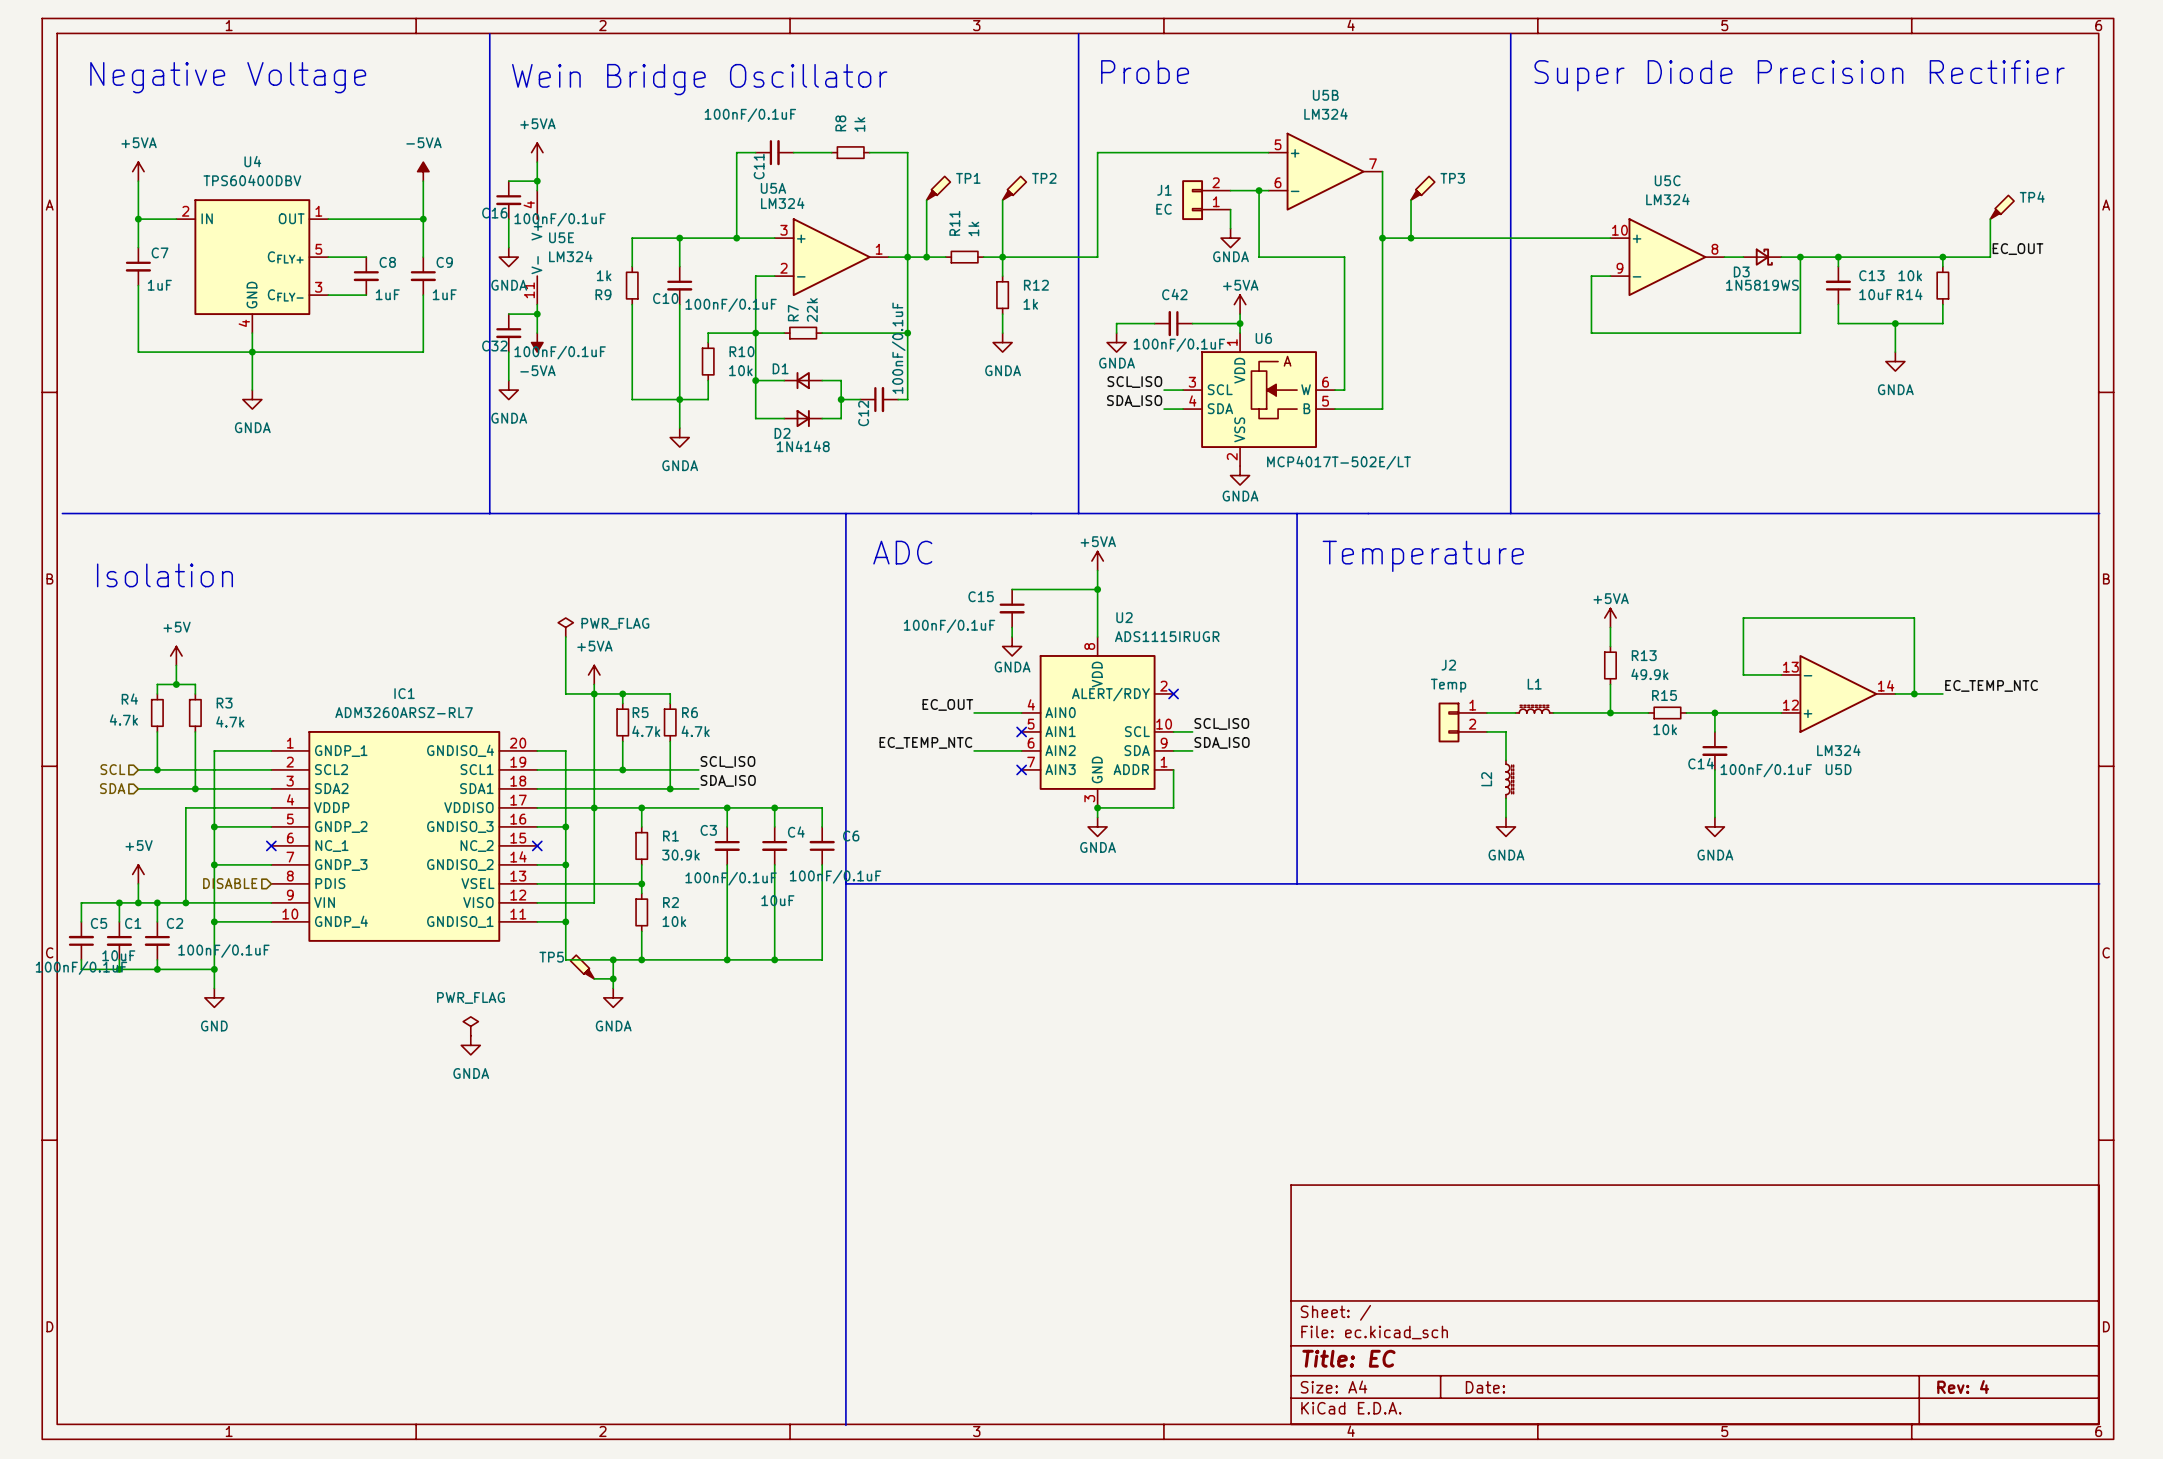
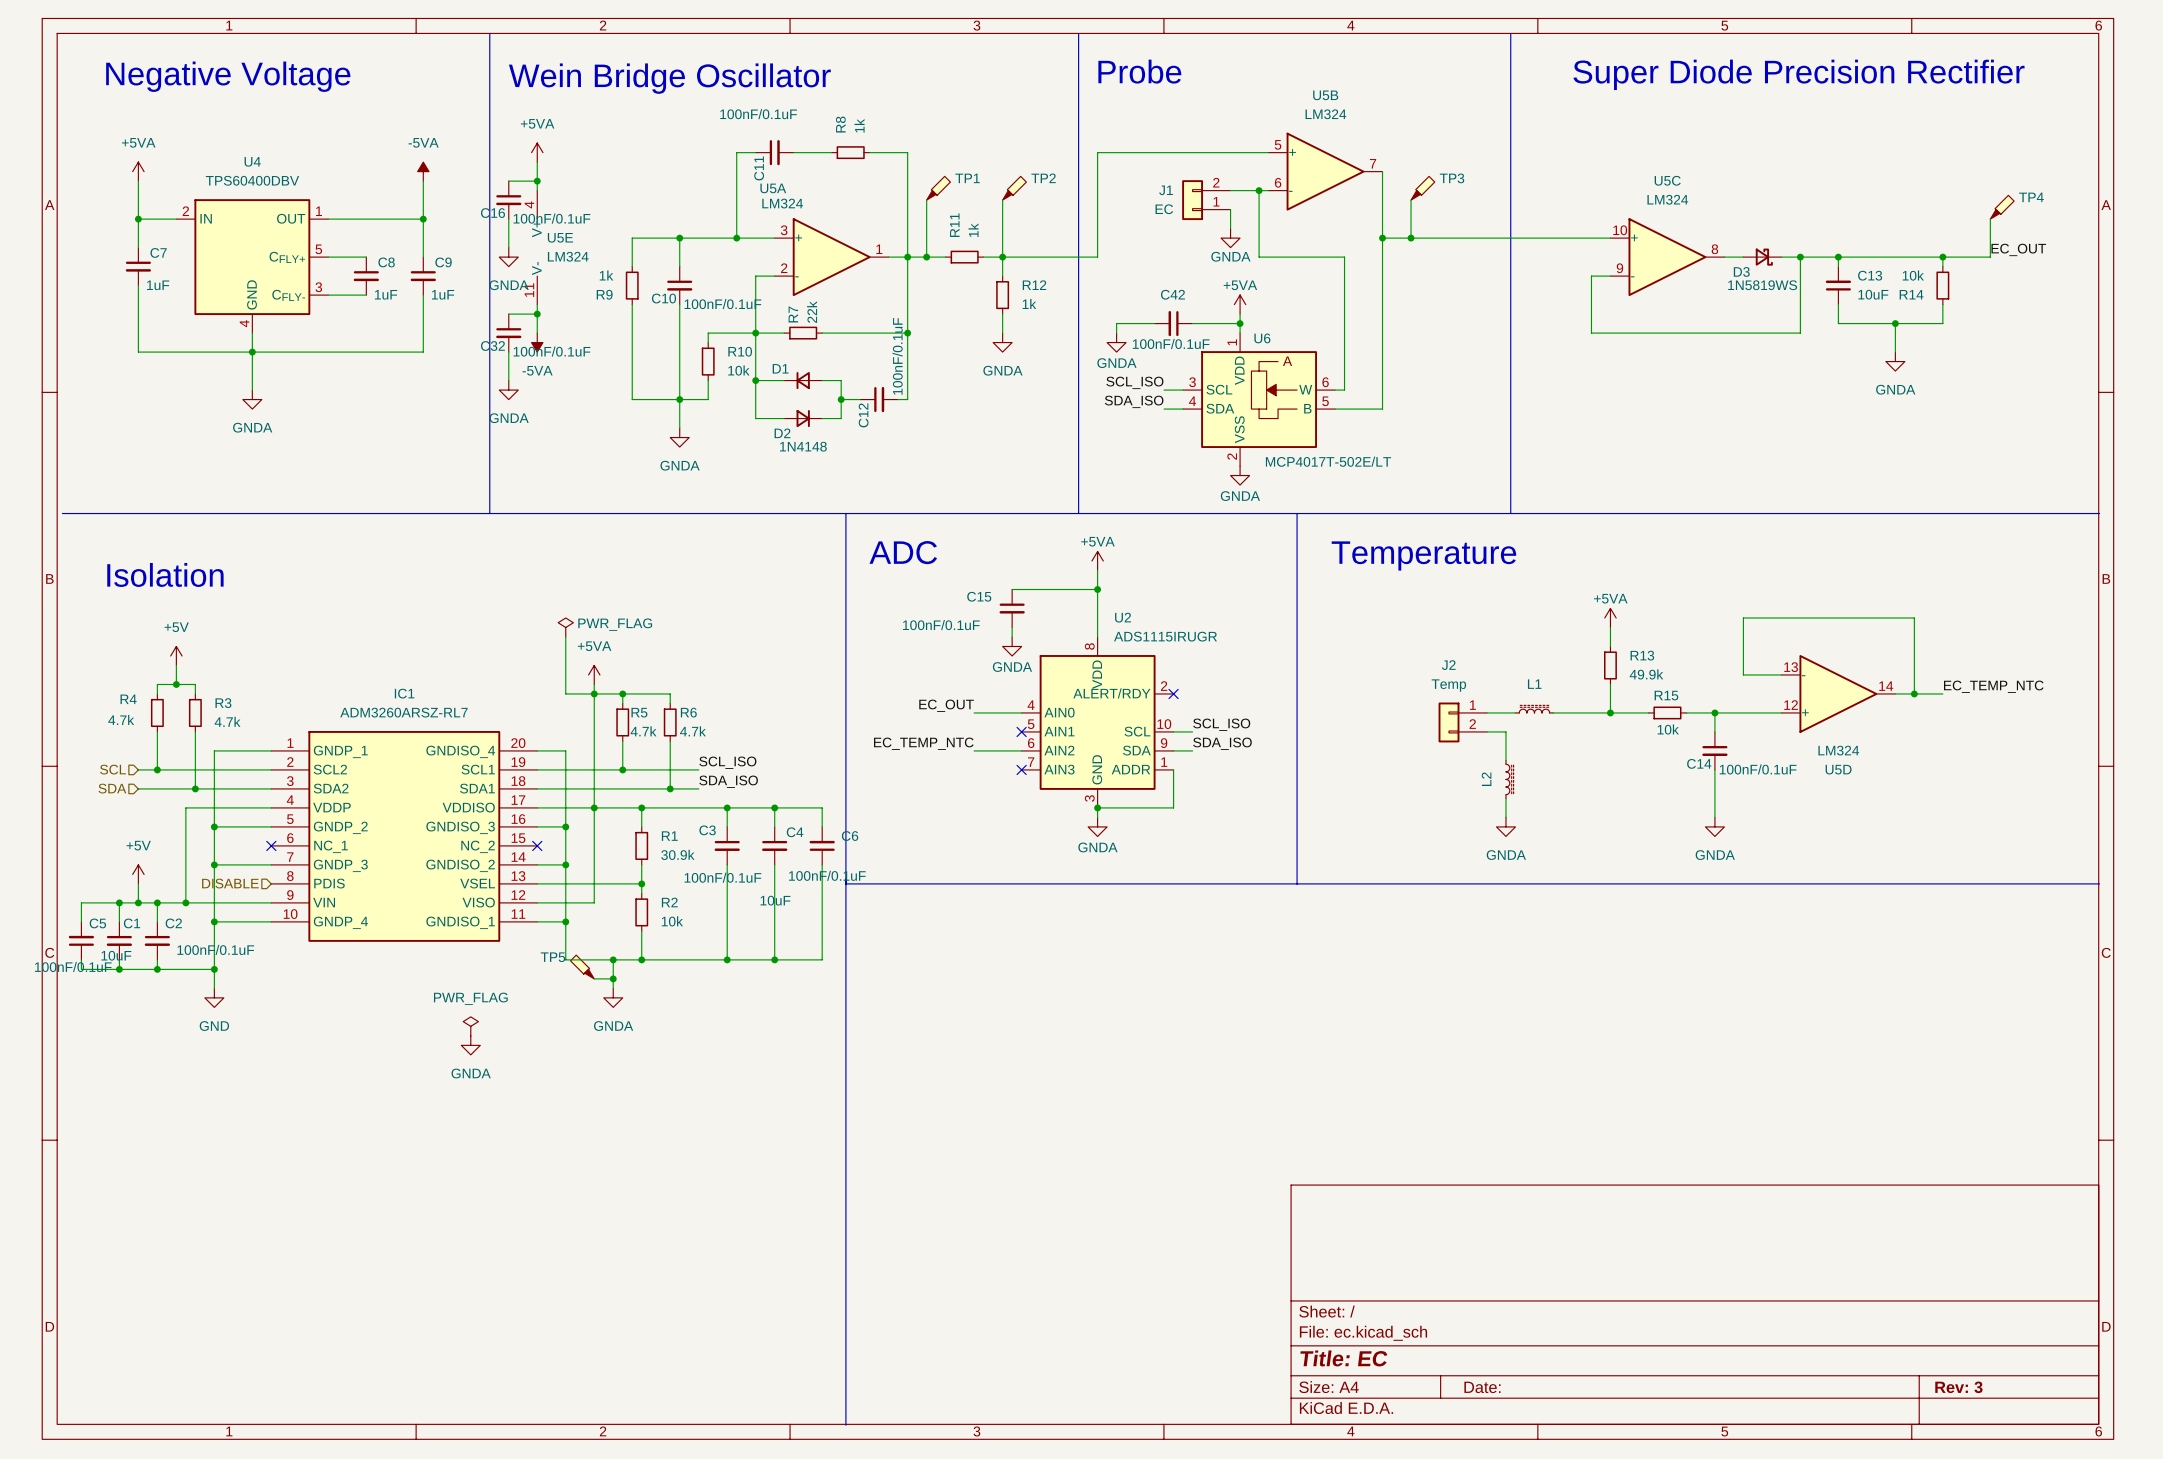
title block: Rev: 4 (1963, 1387) -> Rev: 3 (1958, 1387)

